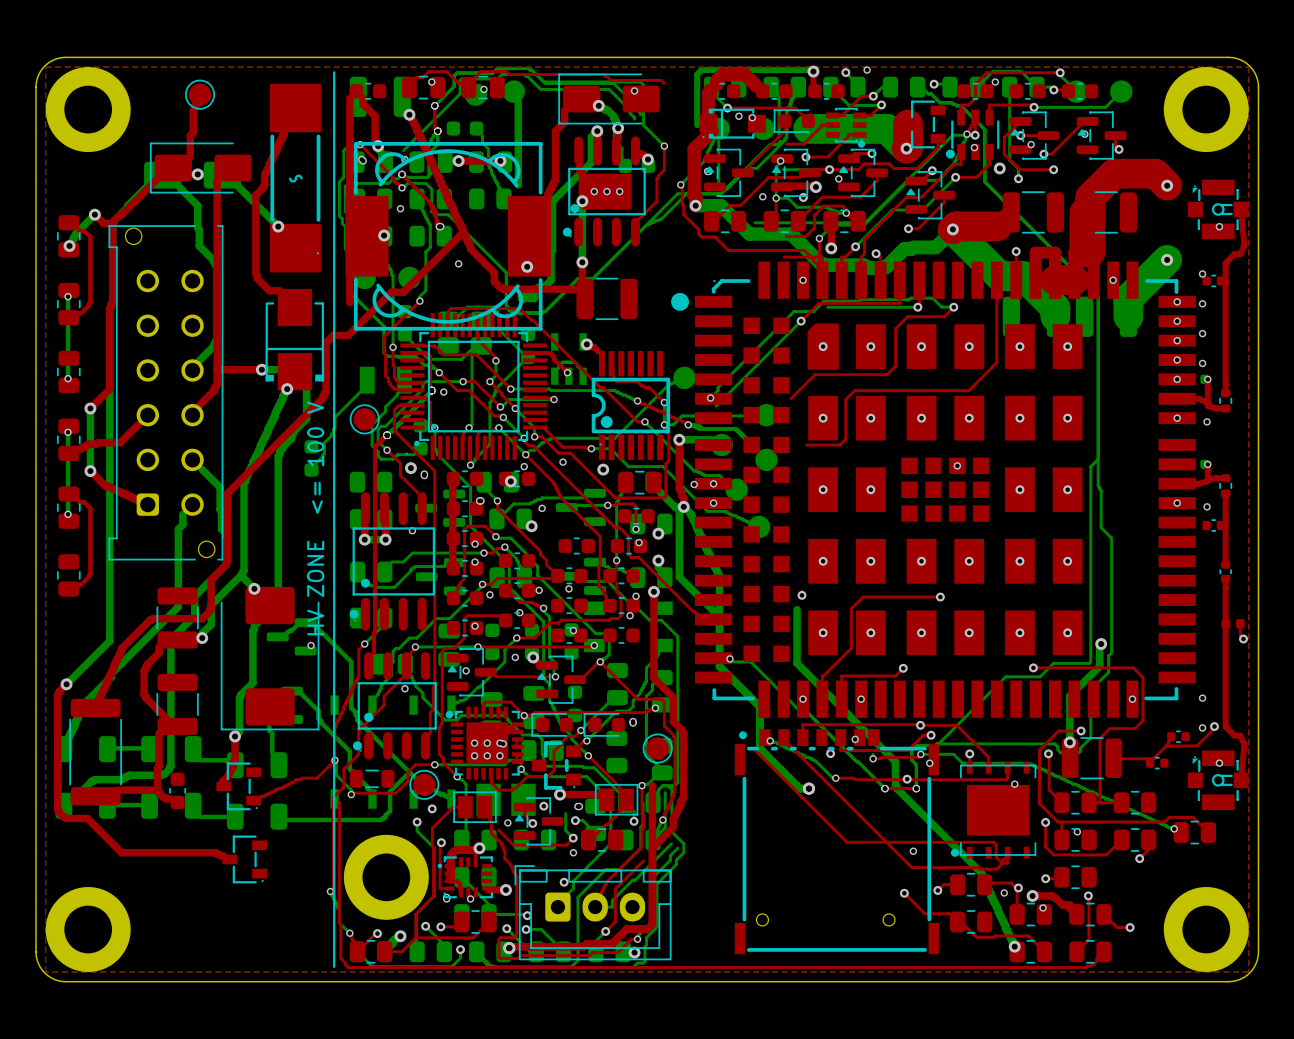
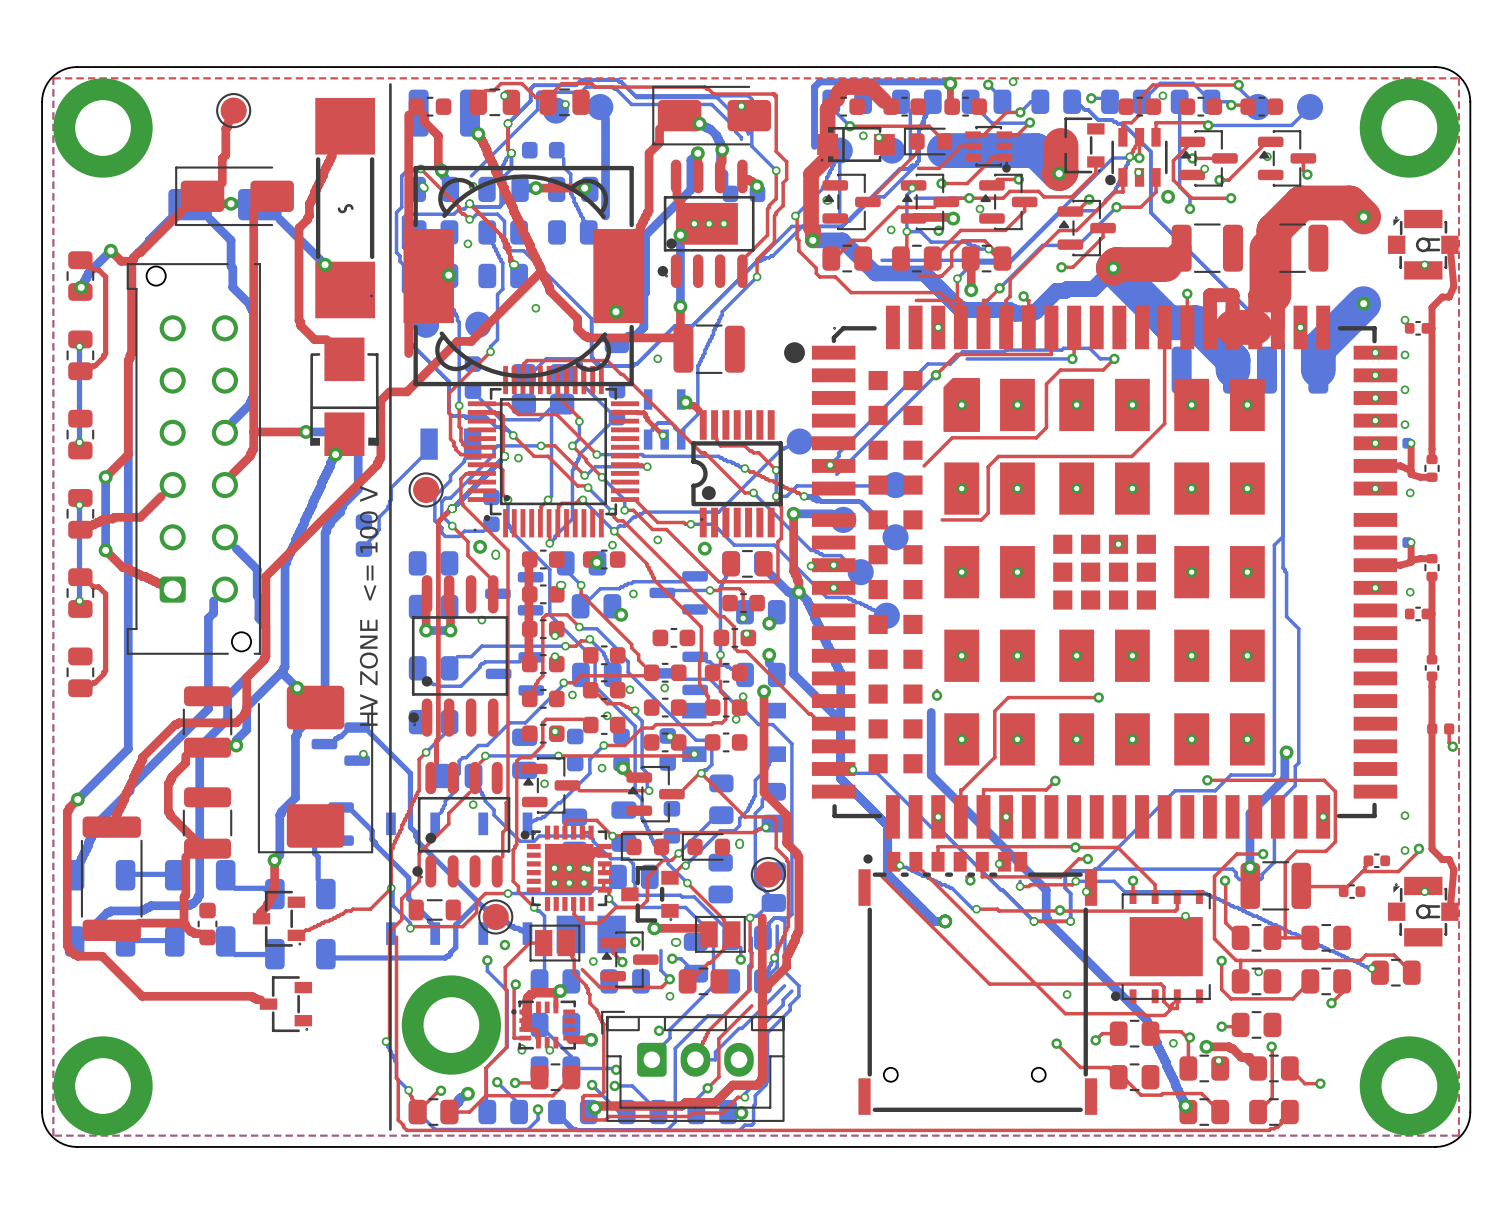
top track: none -> (772, 94) (776, 95) (776, 151) (786, 161) (786, 179) (783, 182) (783, 205) (774, 215) (774, 242) (757, 259) (757, 276)
bottom track: none -> (757, 276) (722, 311) (697, 365) (697, 414) (682, 430)
via: none -> (757, 276)
via: none -> (657, 358)

